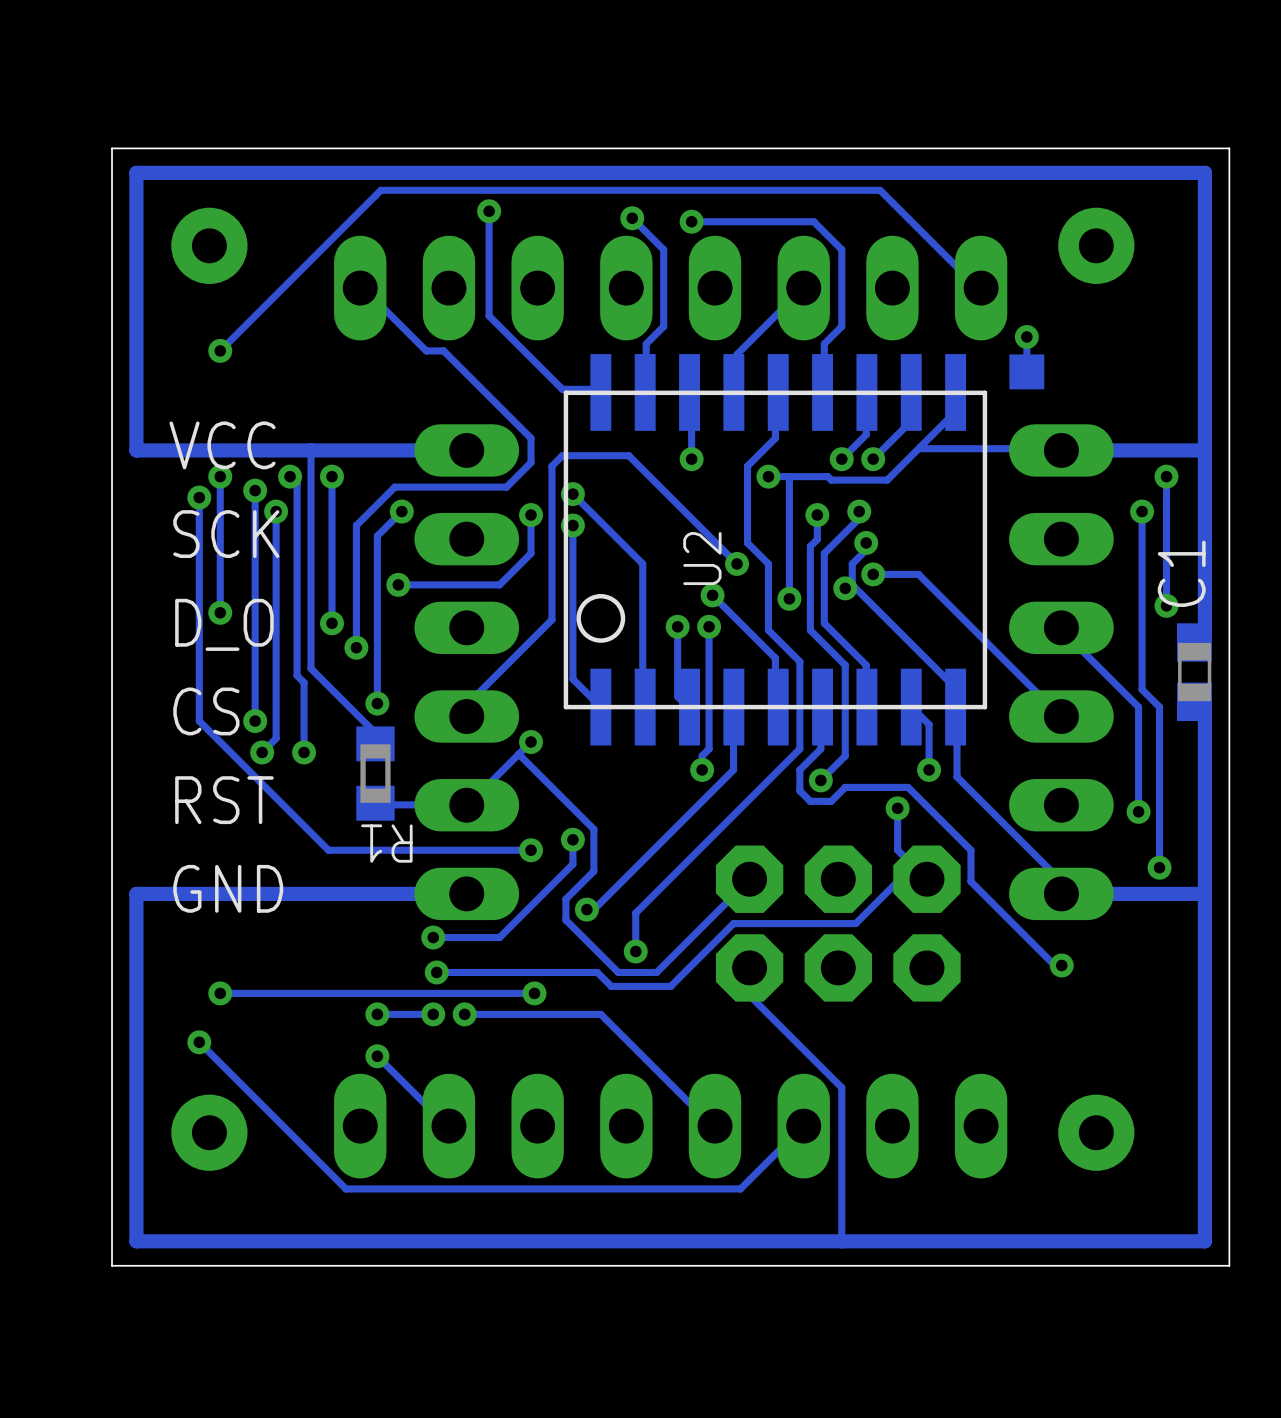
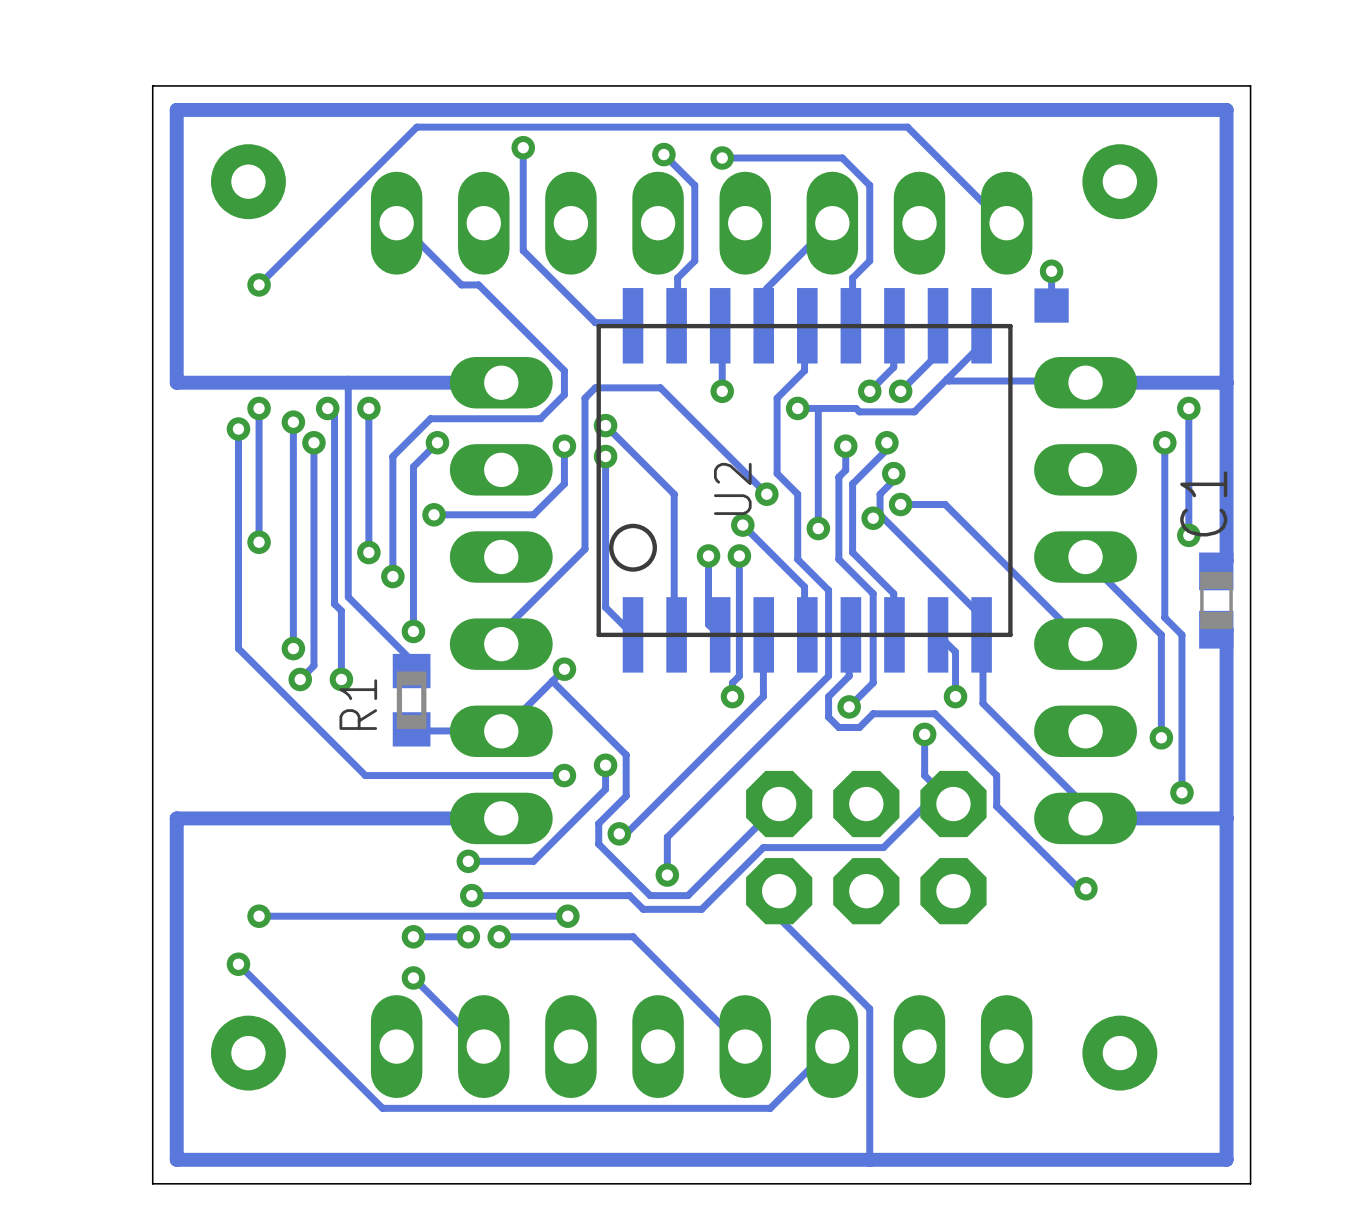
text: VCC (222, 445) -> none
text: SCK (226, 534) -> none
text: D_O (224, 624) -> none
text: CS (206, 711) -> none
text: RST (224, 800) -> none
text rotation: 0° (386, 843) -> 90° clockwise (358, 704)
text position: R1 (386, 843) -> R1 (358, 704)
text: GND (228, 888) -> none

